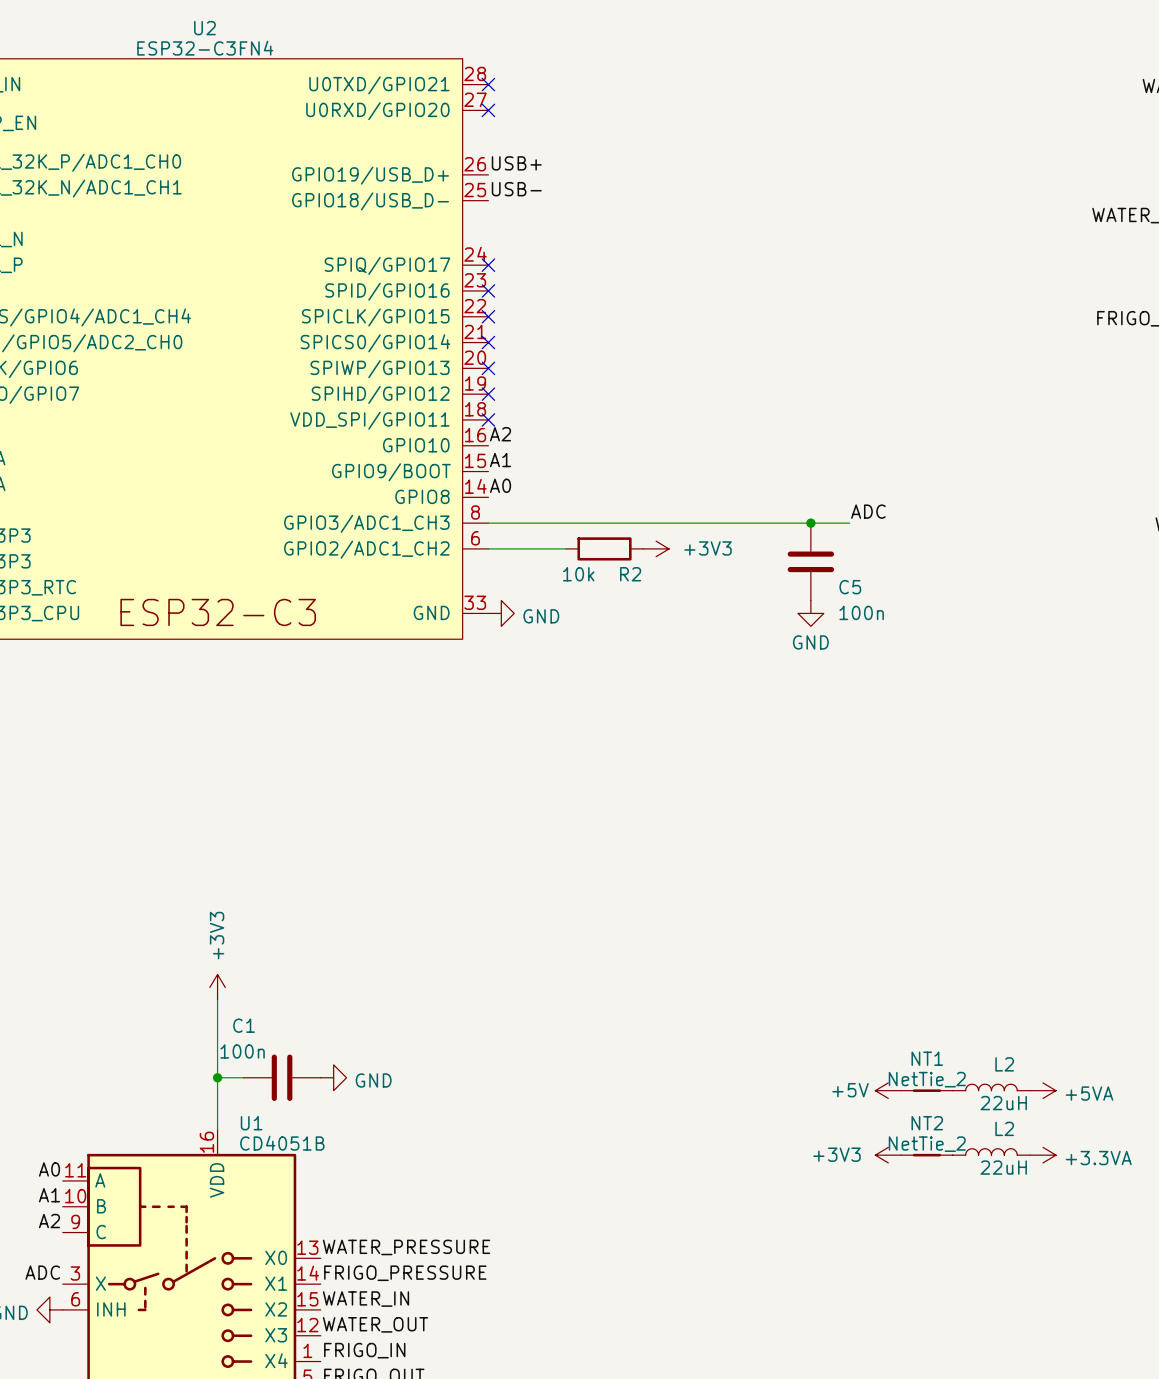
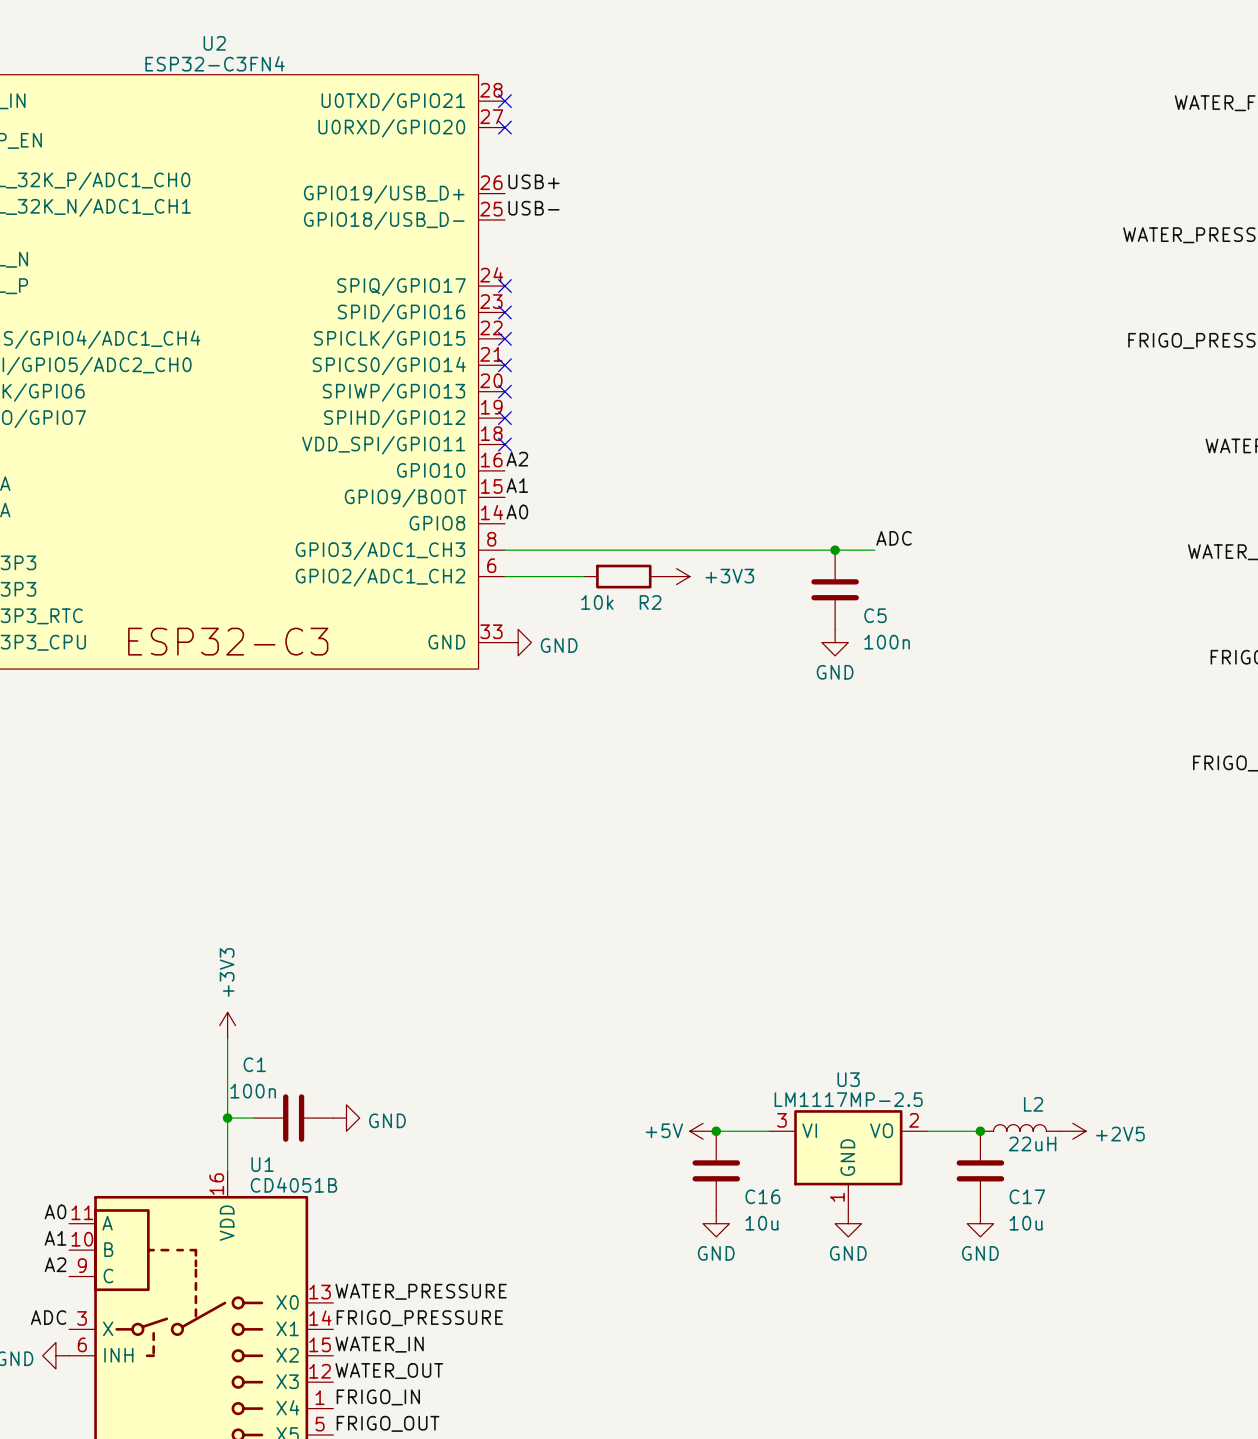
wire: none -> (716, 1131) (769, 1131)
junction: none -> (716, 1131)
power symbol position: +5V (888, 1090) -> +5V (703, 1131)
NT1: NetTie_2 (926, 1090) -> none
junction: none -> (980, 1131)
power symbol: +5VA (1043, 1090) -> +2V5 (1072, 1131)
U3: none -> LM1117MP-2.5 (848, 1160)
C16: none -> 10u (716, 1170)
C17: none -> 10u (980, 1170)
L2: 22uH (991, 1151) -> none
power symbol: +3V3 (888, 1155) -> none
NT2: NetTie_2 (926, 1155) -> none
power symbol: +3.3VA (1043, 1155) -> none
power symbol: none -> GND (716, 1223)
power symbol: none -> GND (848, 1223)
power symbol: none -> GND (980, 1223)

